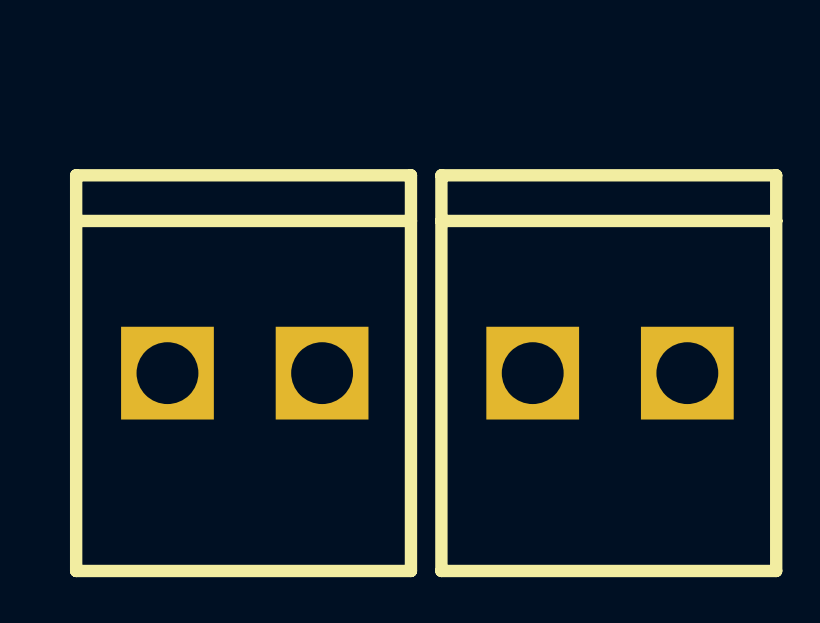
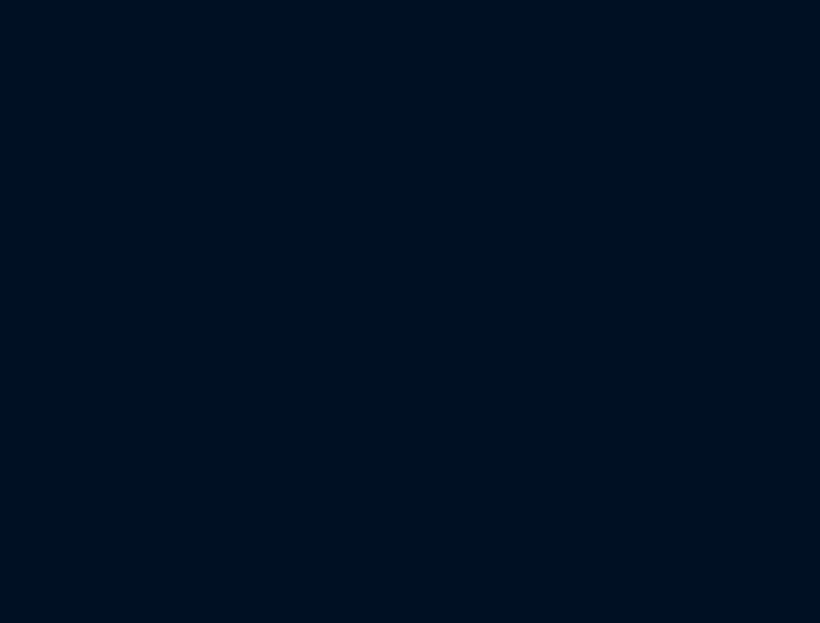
part: (243, 373) -> none
part: (608, 373) -> none

